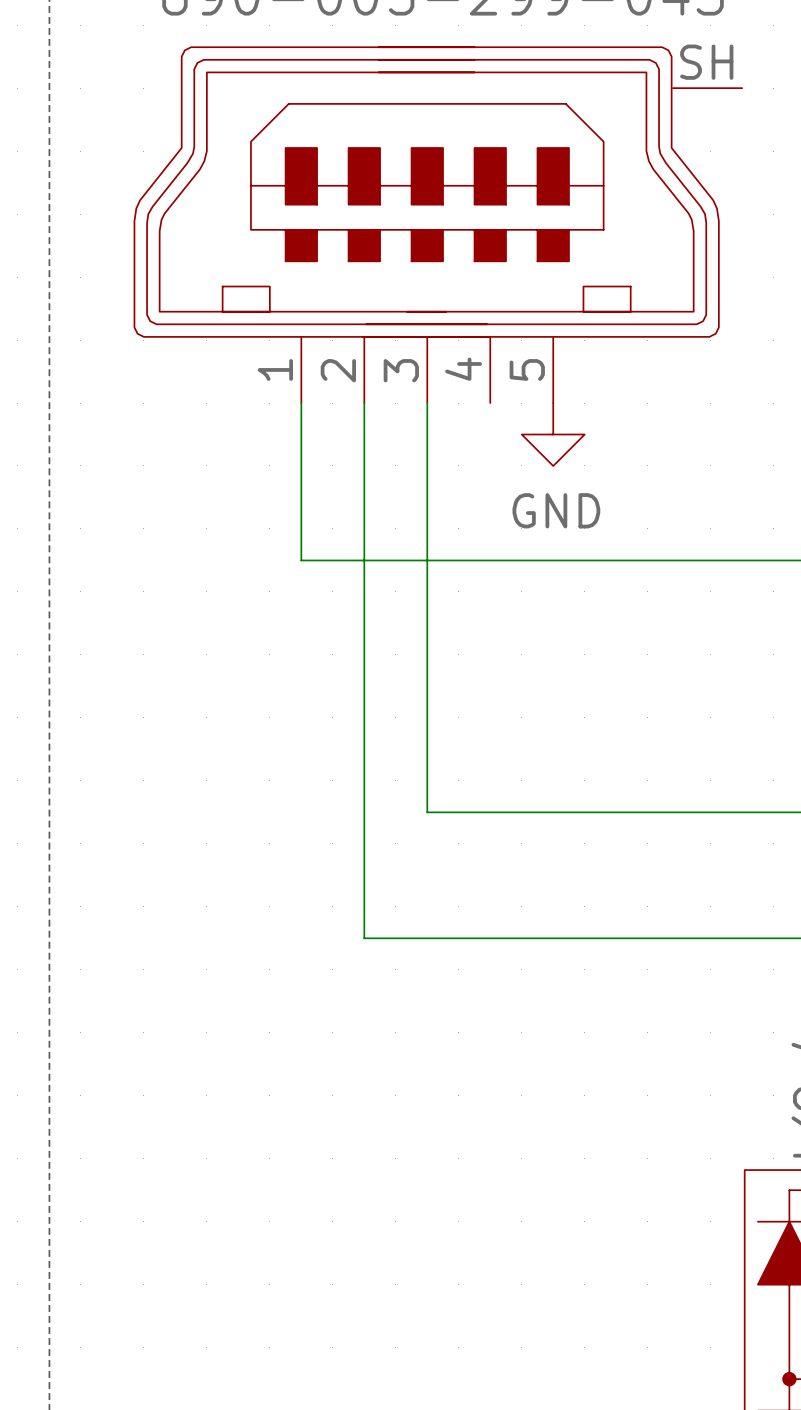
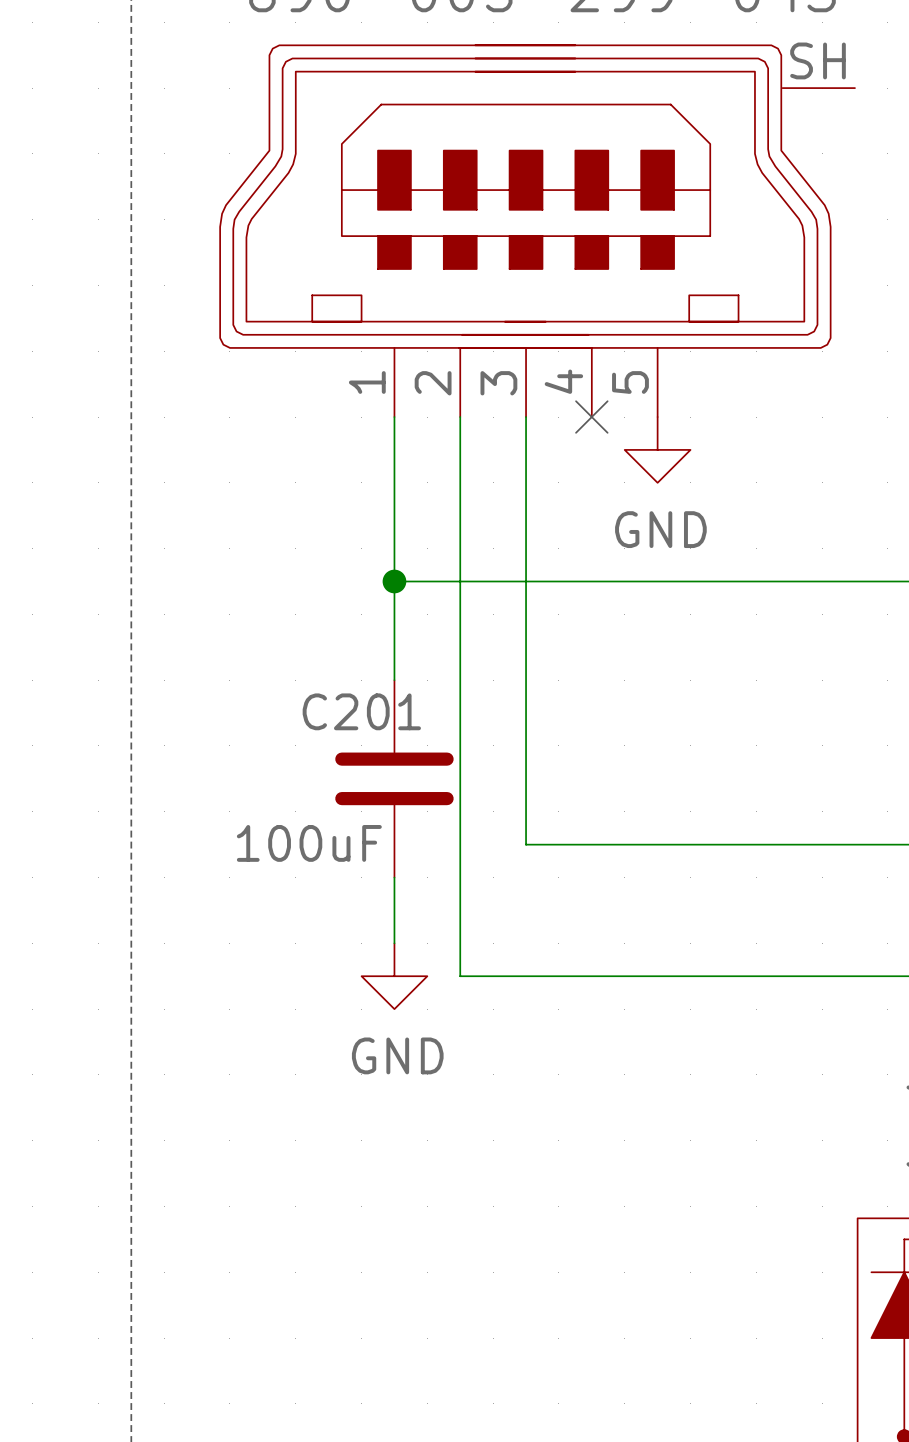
no-connect mark: none -> (591, 417)
wire: none -> (394, 581) (394, 680)
junction: none -> (394, 581)
C201: none -> 100uF (394, 778)
wire: none -> (394, 877) (394, 943)
power symbol: none -> GND (394, 976)

